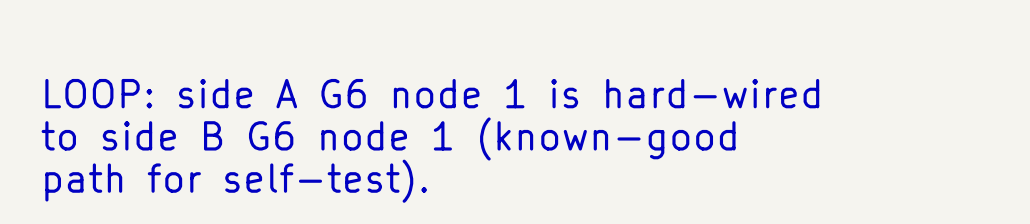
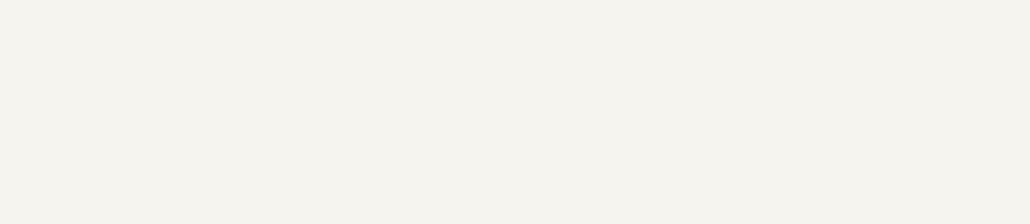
text: LOOP: side A G6 node 1 is hard-wired (432, 93) -> none
text: to side B G6 node 1 (known-good (388, 138) -> none
text: path for self-test). (236, 181) -> none

